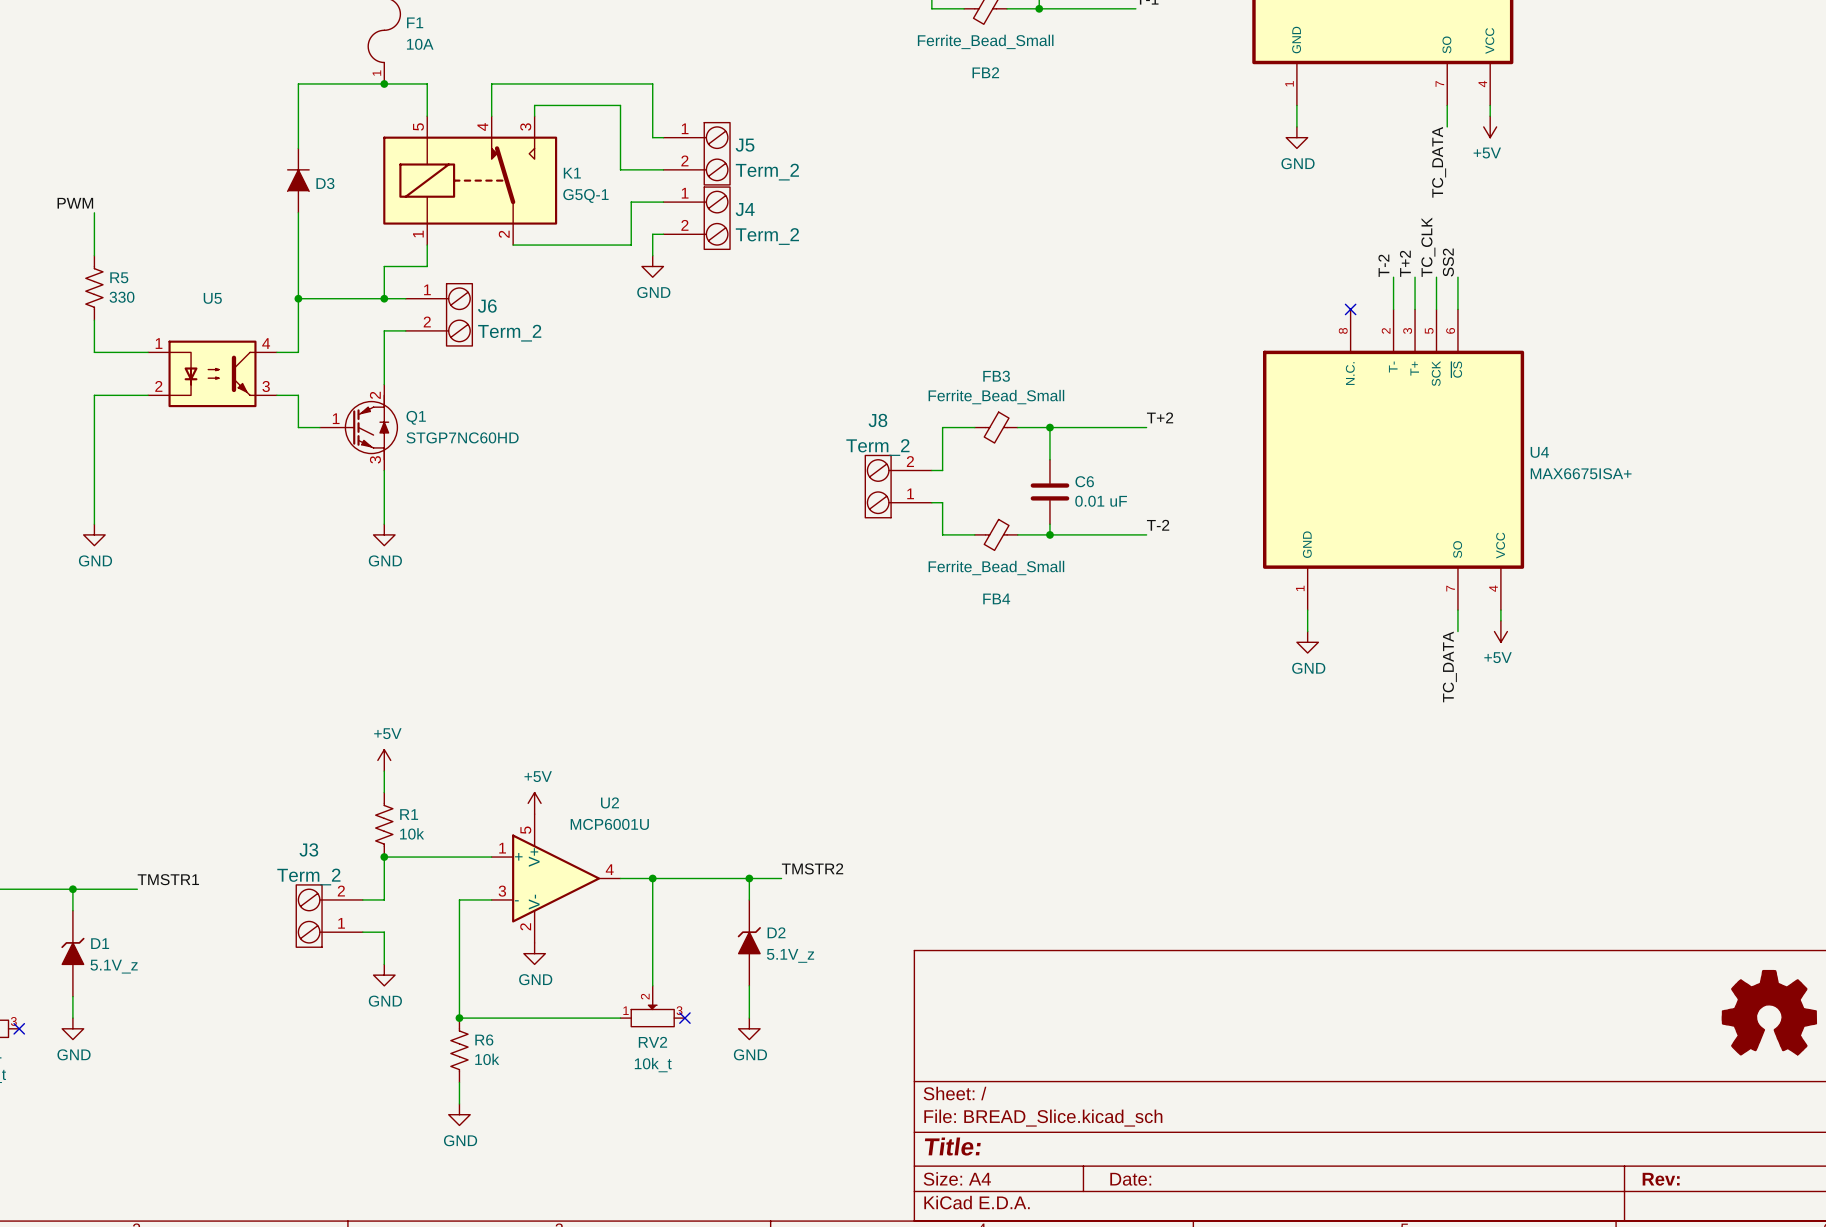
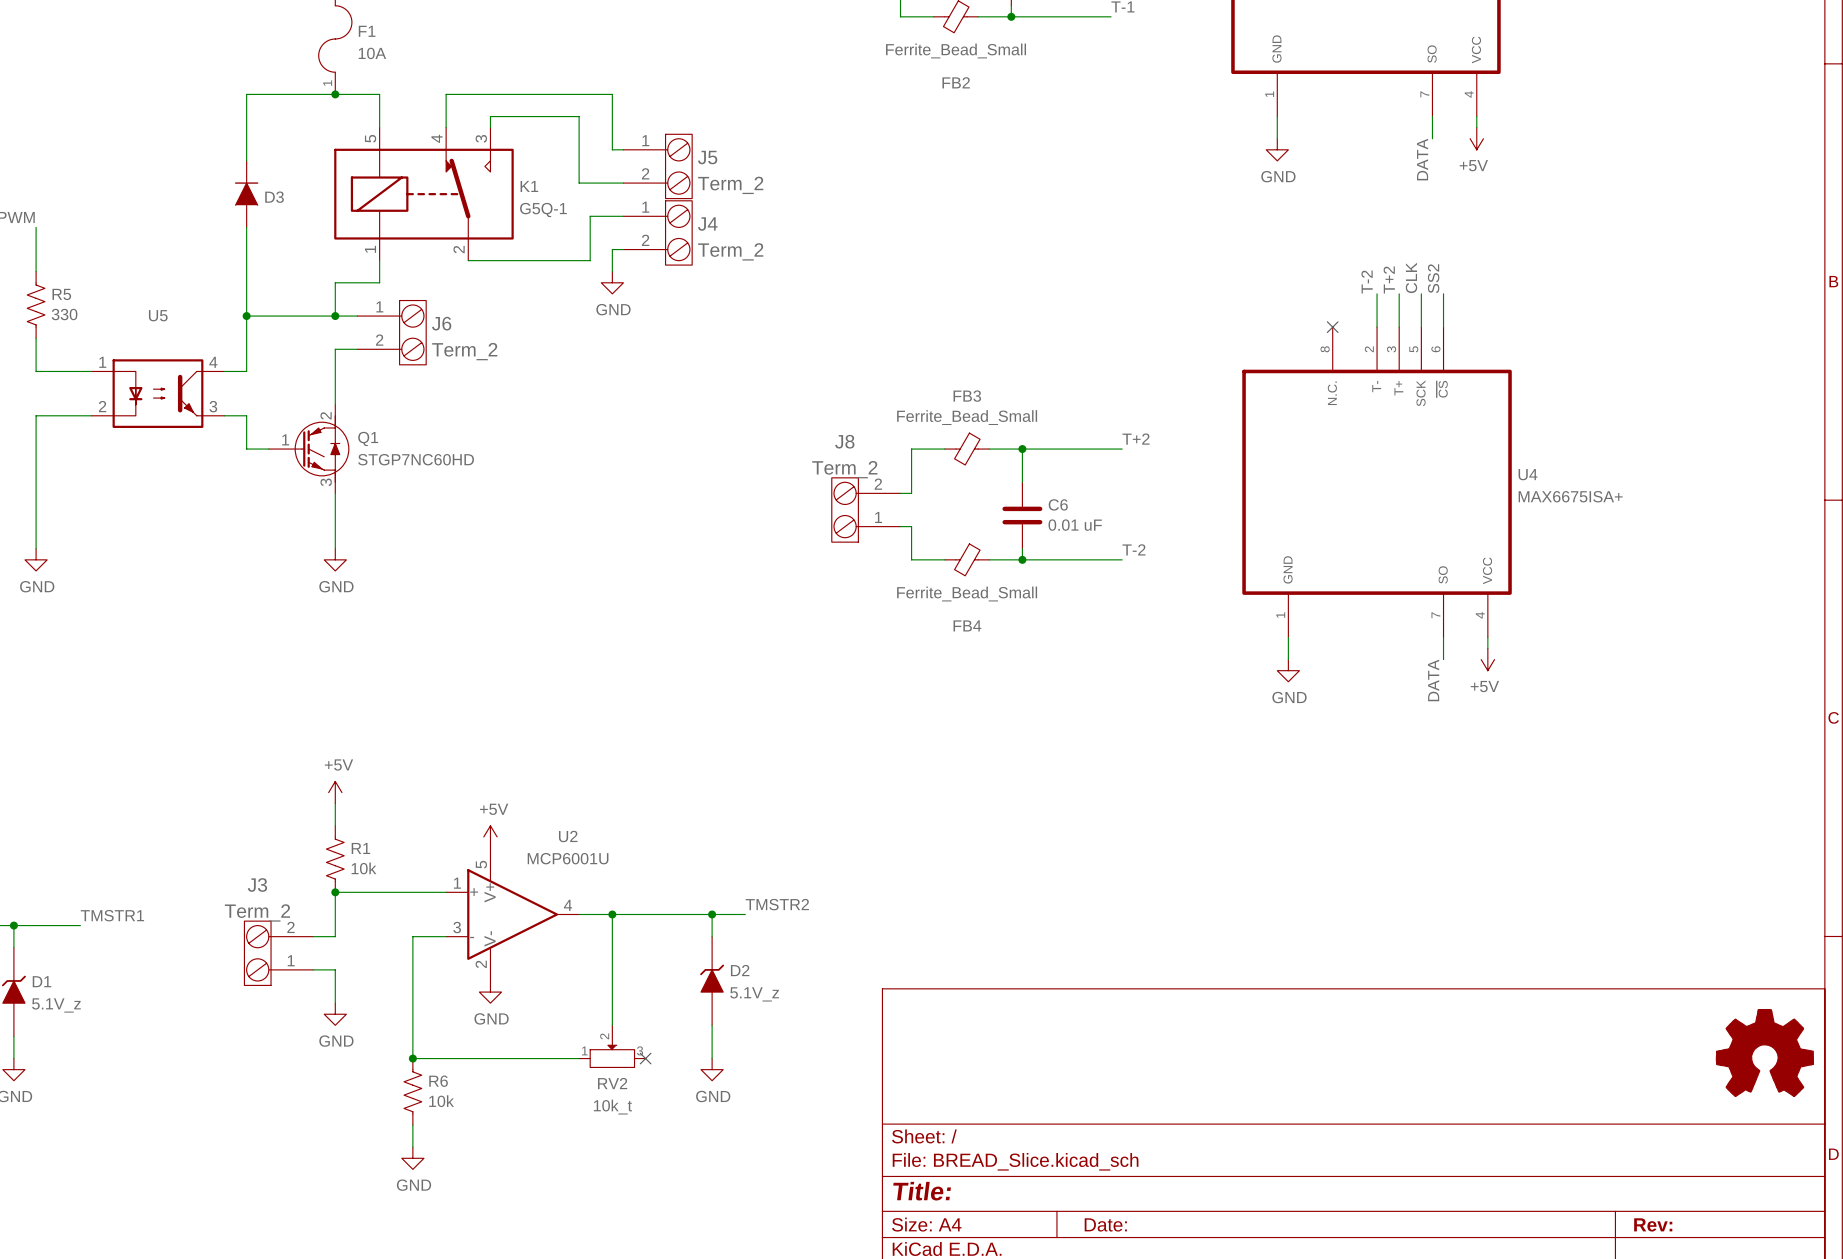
label: TC_DATA (1439, 162) -> DATA (1422, 159)
label: TC_CLK (1428, 247) -> CLK (1411, 277)
label: TC_DATA (1449, 666) -> DATA (1433, 680)

